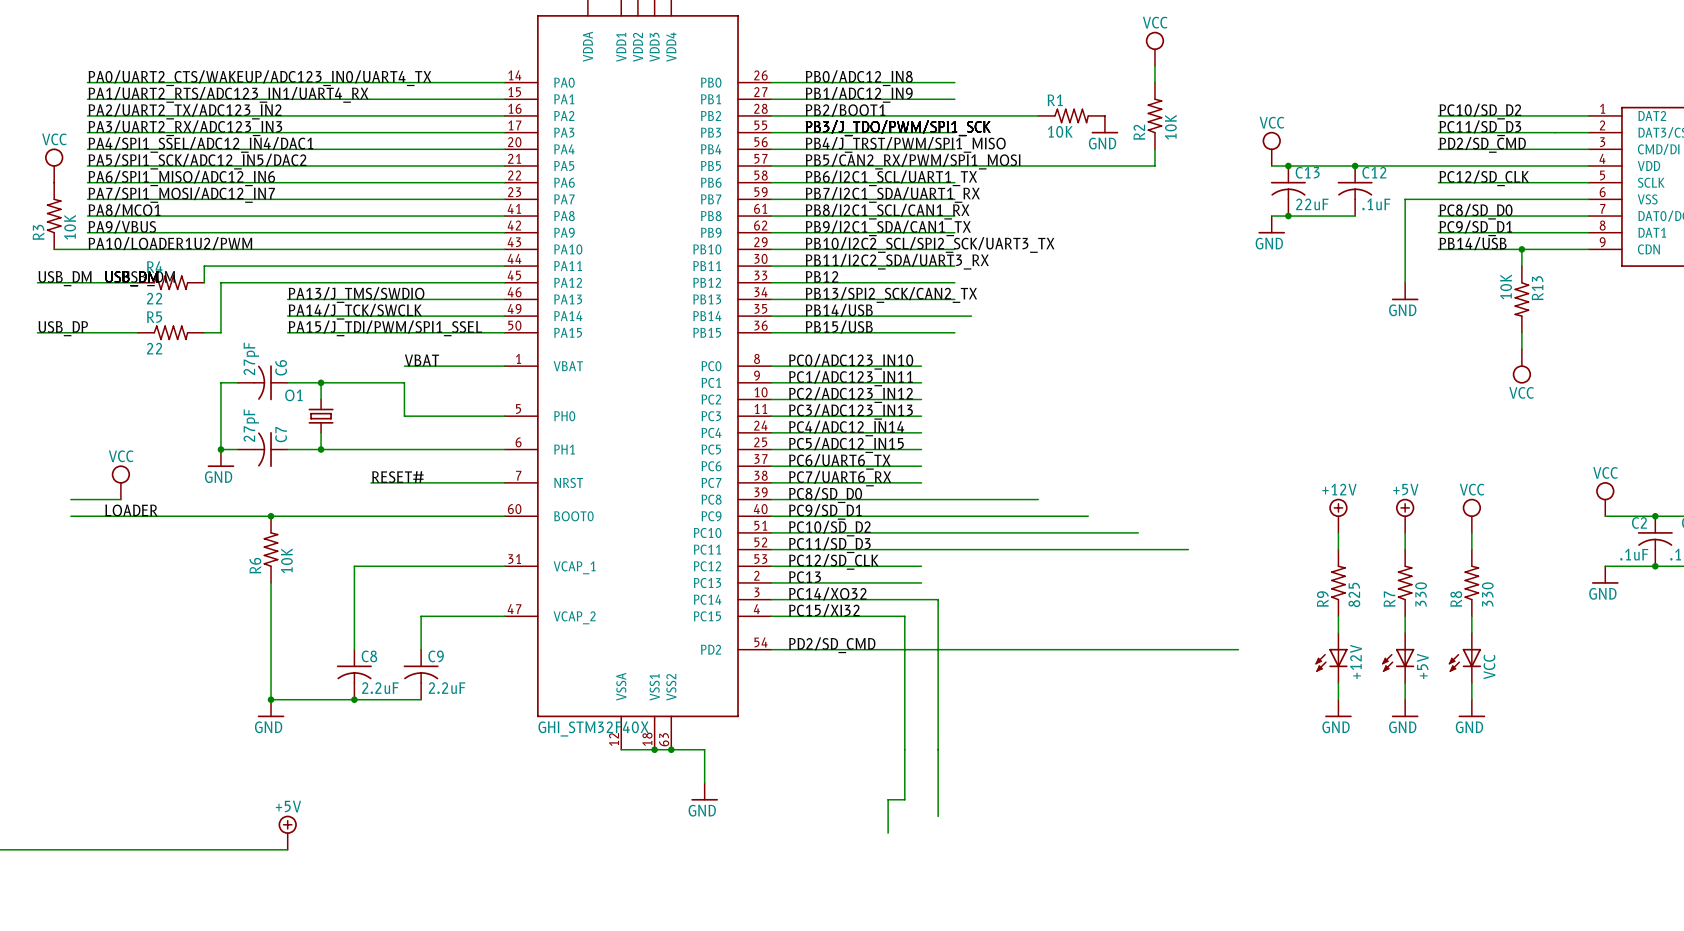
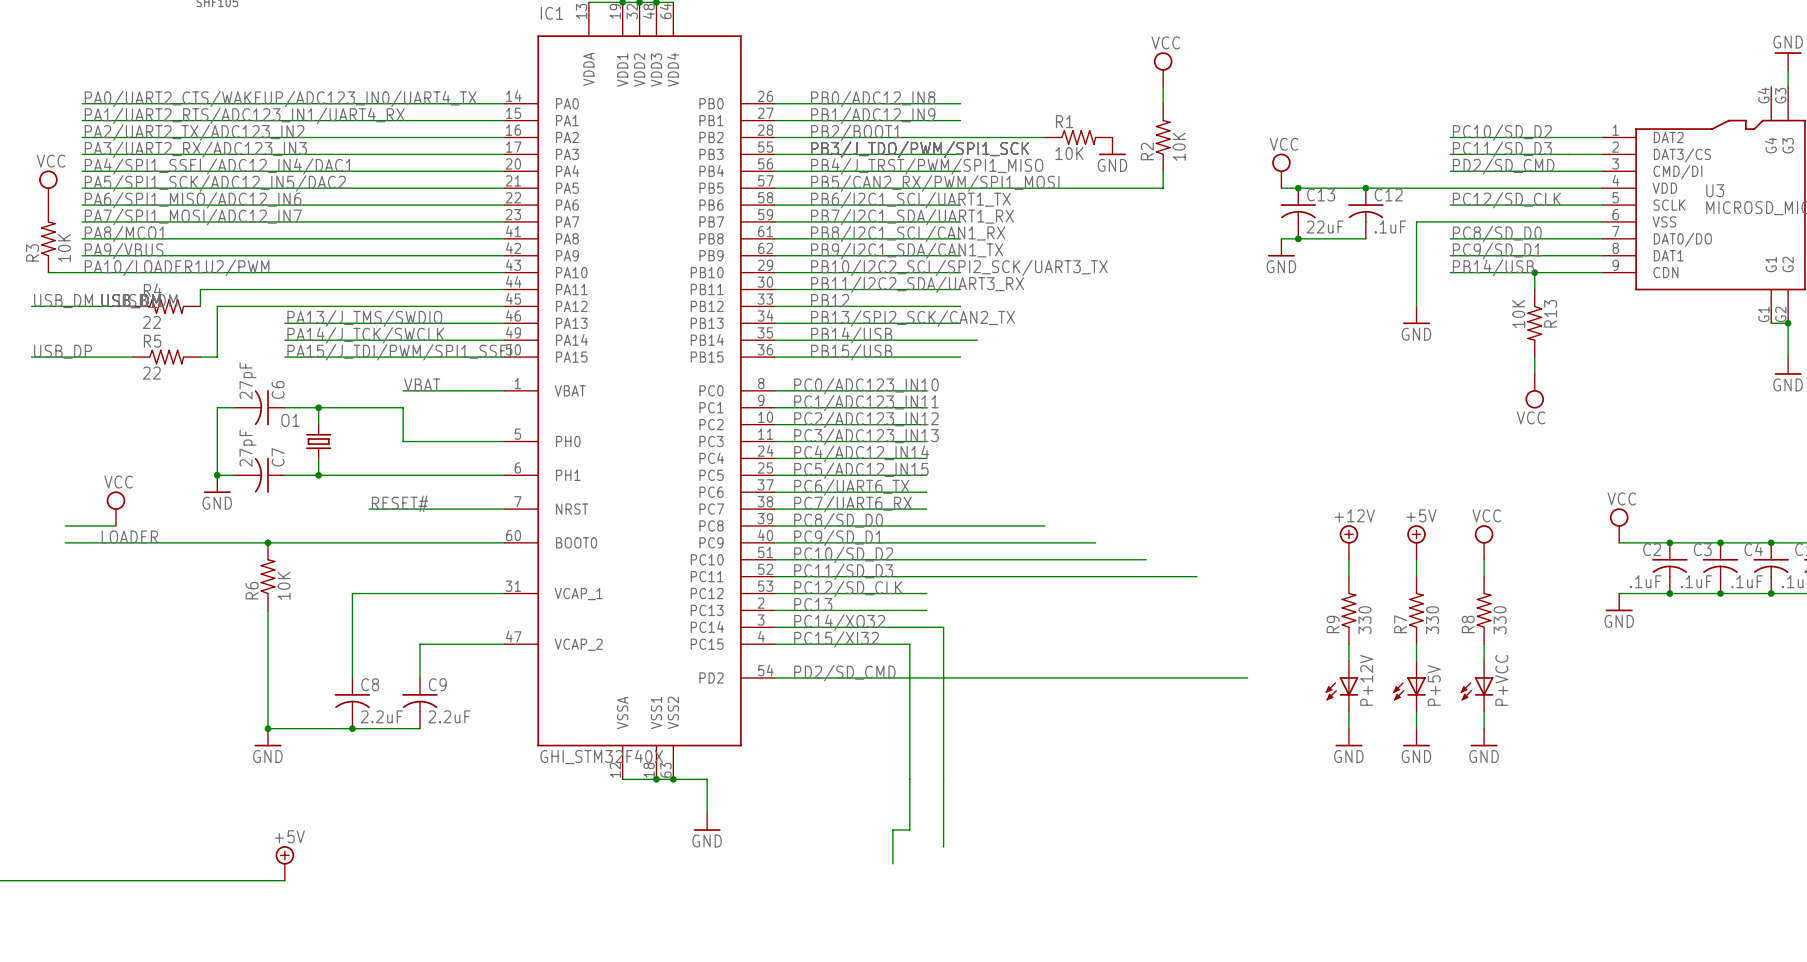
R9 value: 825 (1354, 594) -> 330 (1365, 620)
+12V name: +12V (1356, 661) -> P+12V (1366, 680)
+5V name: +5V (1422, 666) -> P+5V (1434, 685)
VCC name: VCC (1489, 666) -> P+VCC (1501, 680)

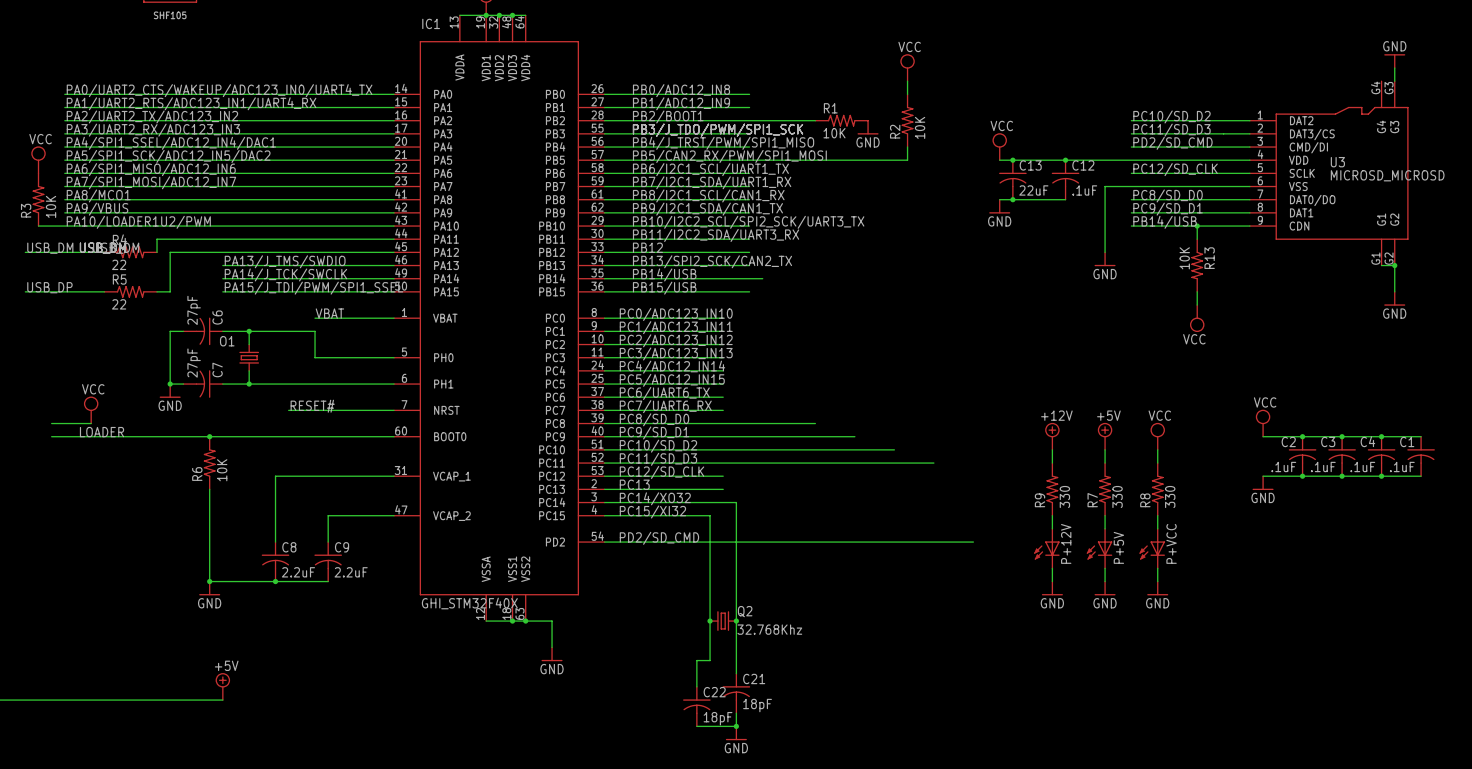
junction: none -> (710, 621)
Q2: none -> 32.768Khz (723, 621)
junction: none -> (736, 621)
C21: none -> 18pF (736, 693)
C22: none -> 18pF (696, 706)
wire: none -> (736, 713) (736, 726) (696, 726)
junction: none -> (736, 726)
power symbol: none -> GND (736, 733)

